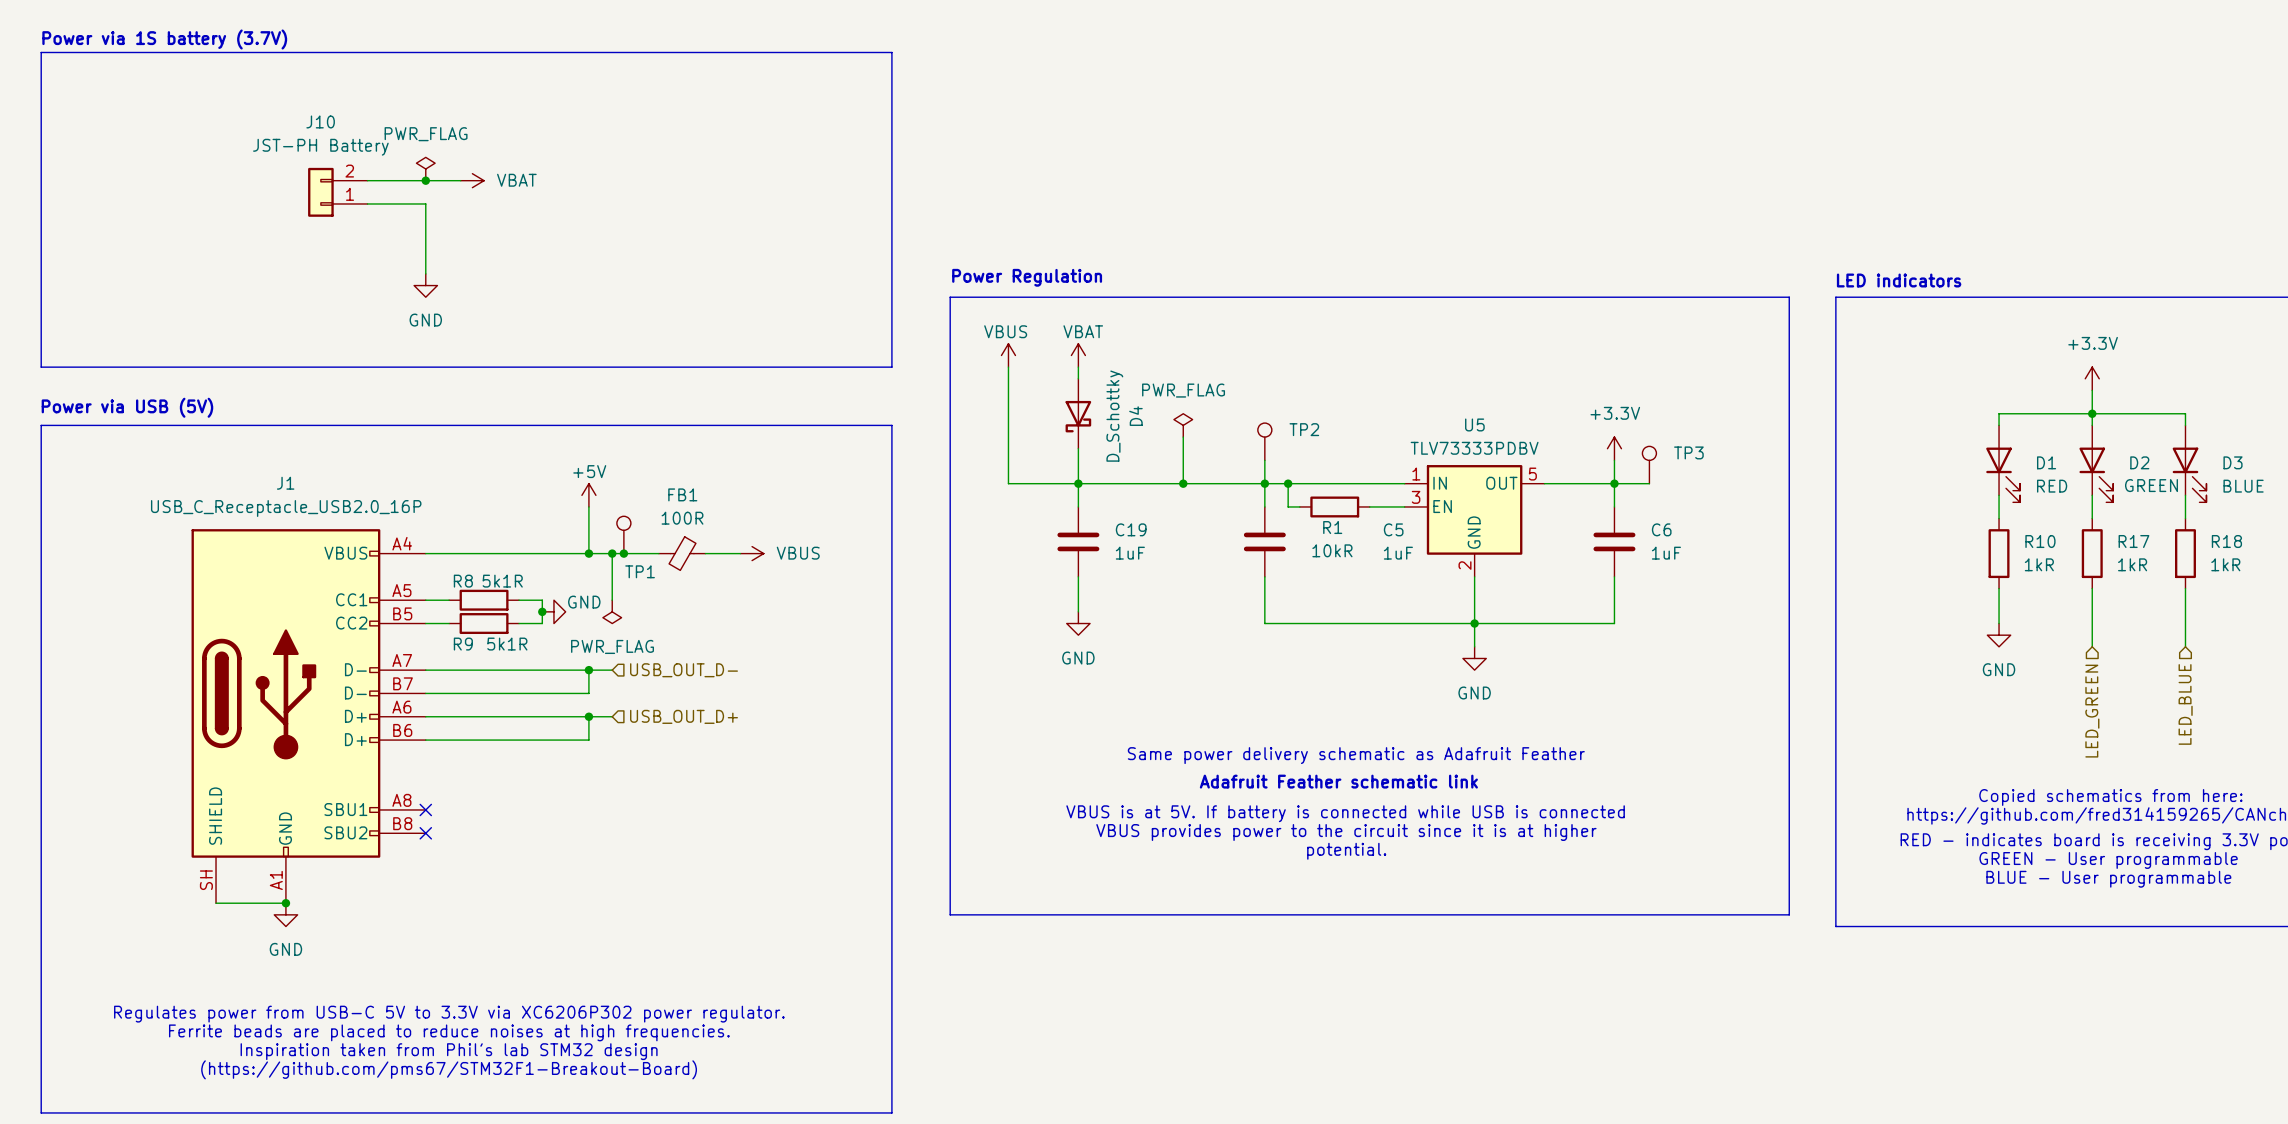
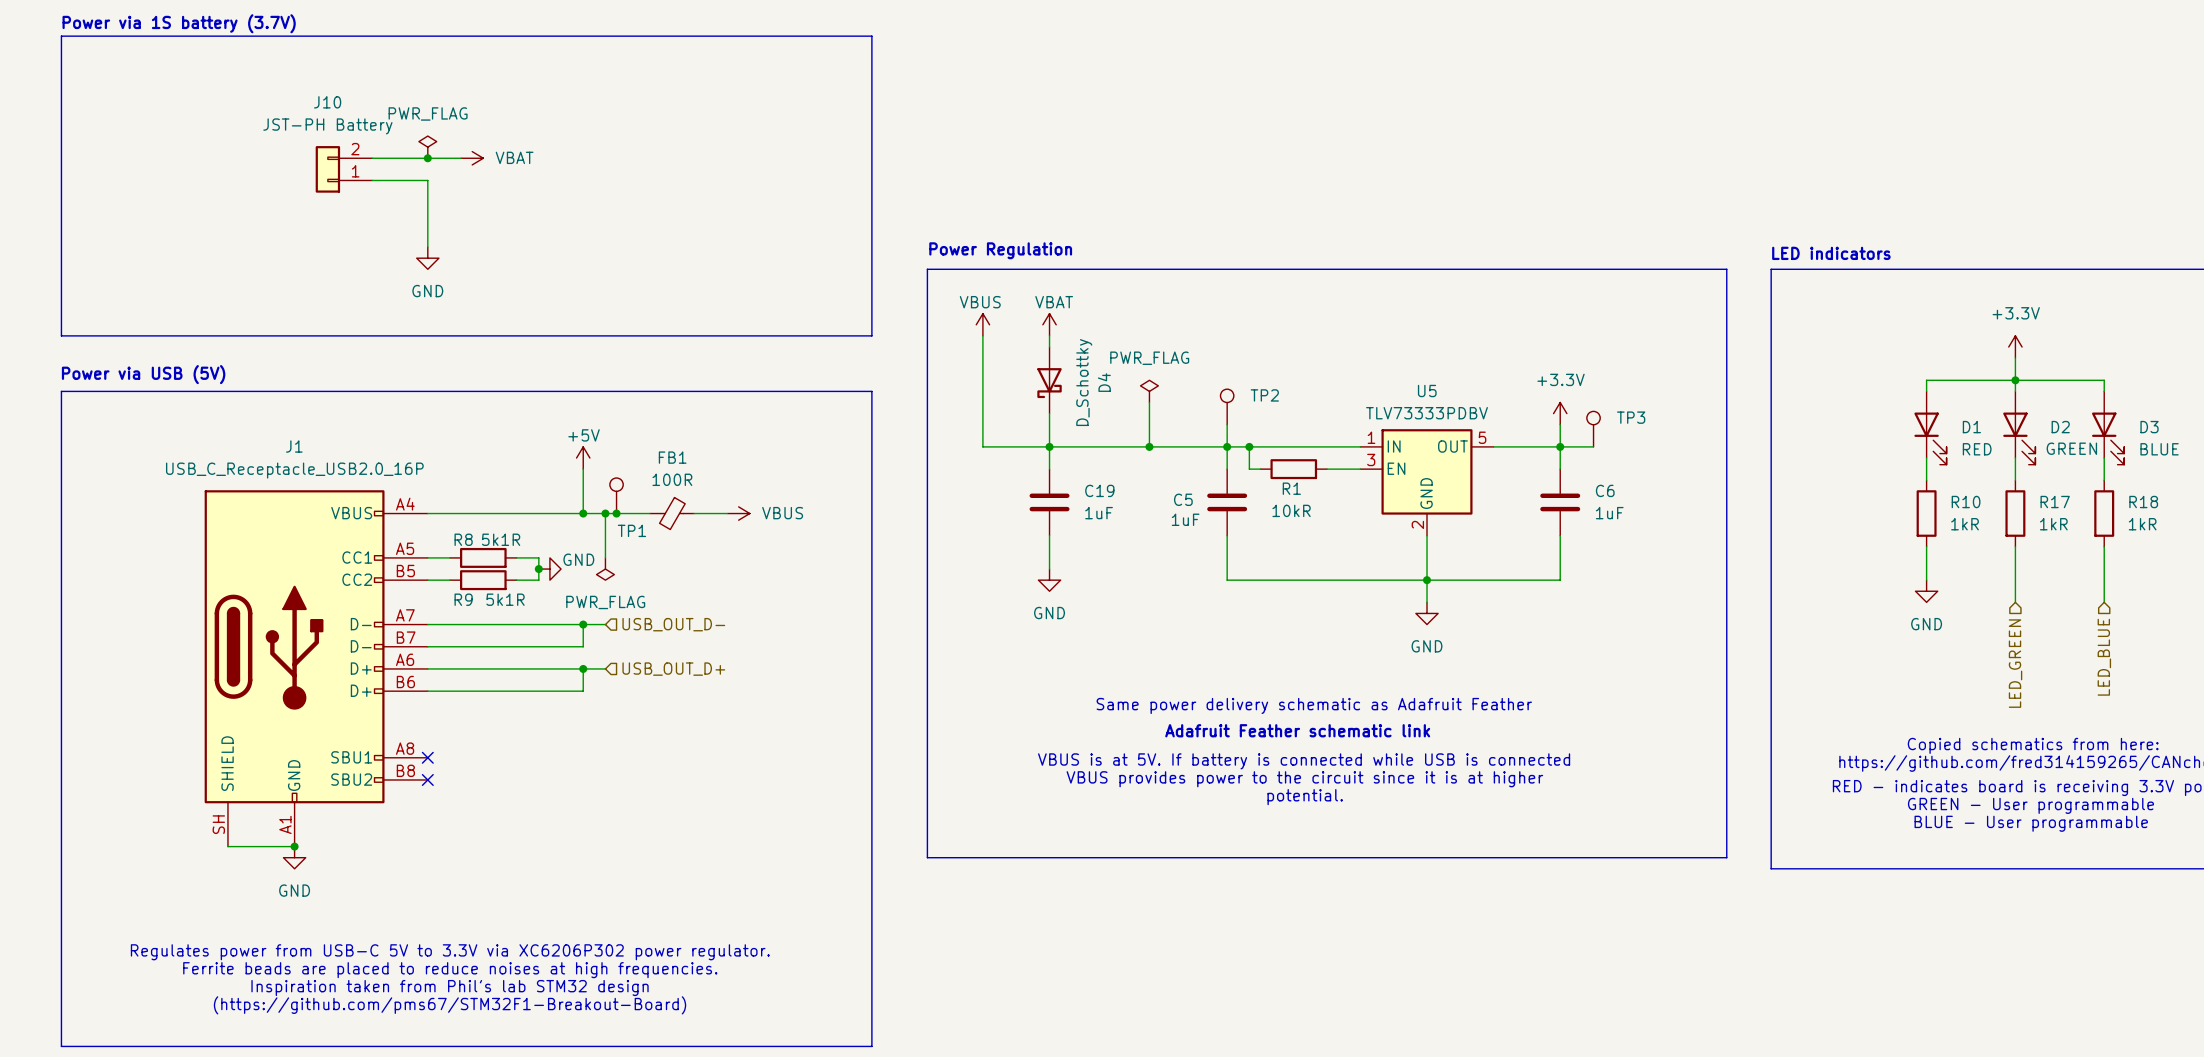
C5 name position: C5 (1393, 529) -> C5 (1183, 499)
C5 value position: 1uF (1398, 553) -> 1uF (1185, 519)

